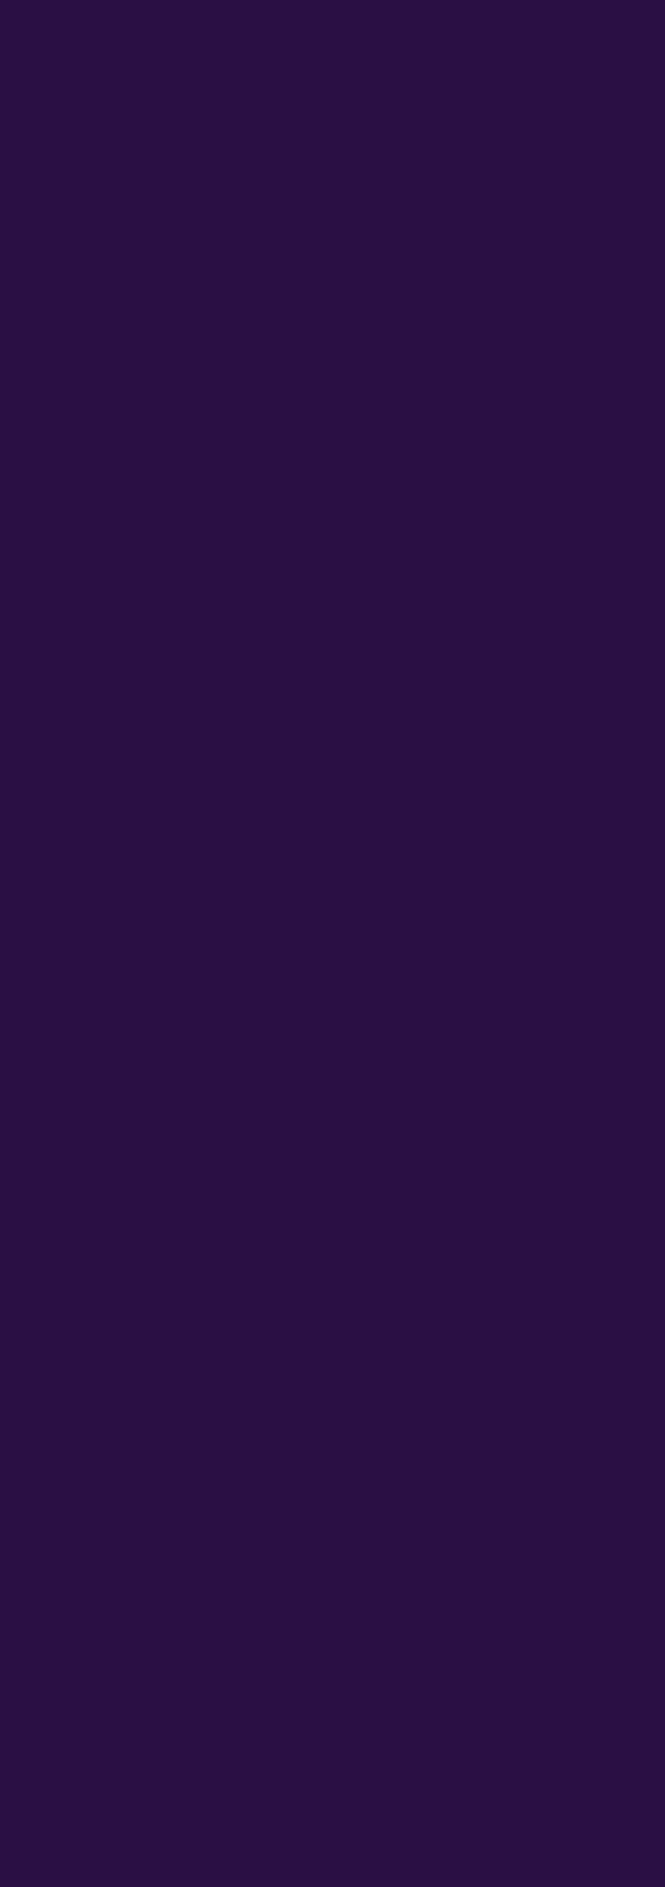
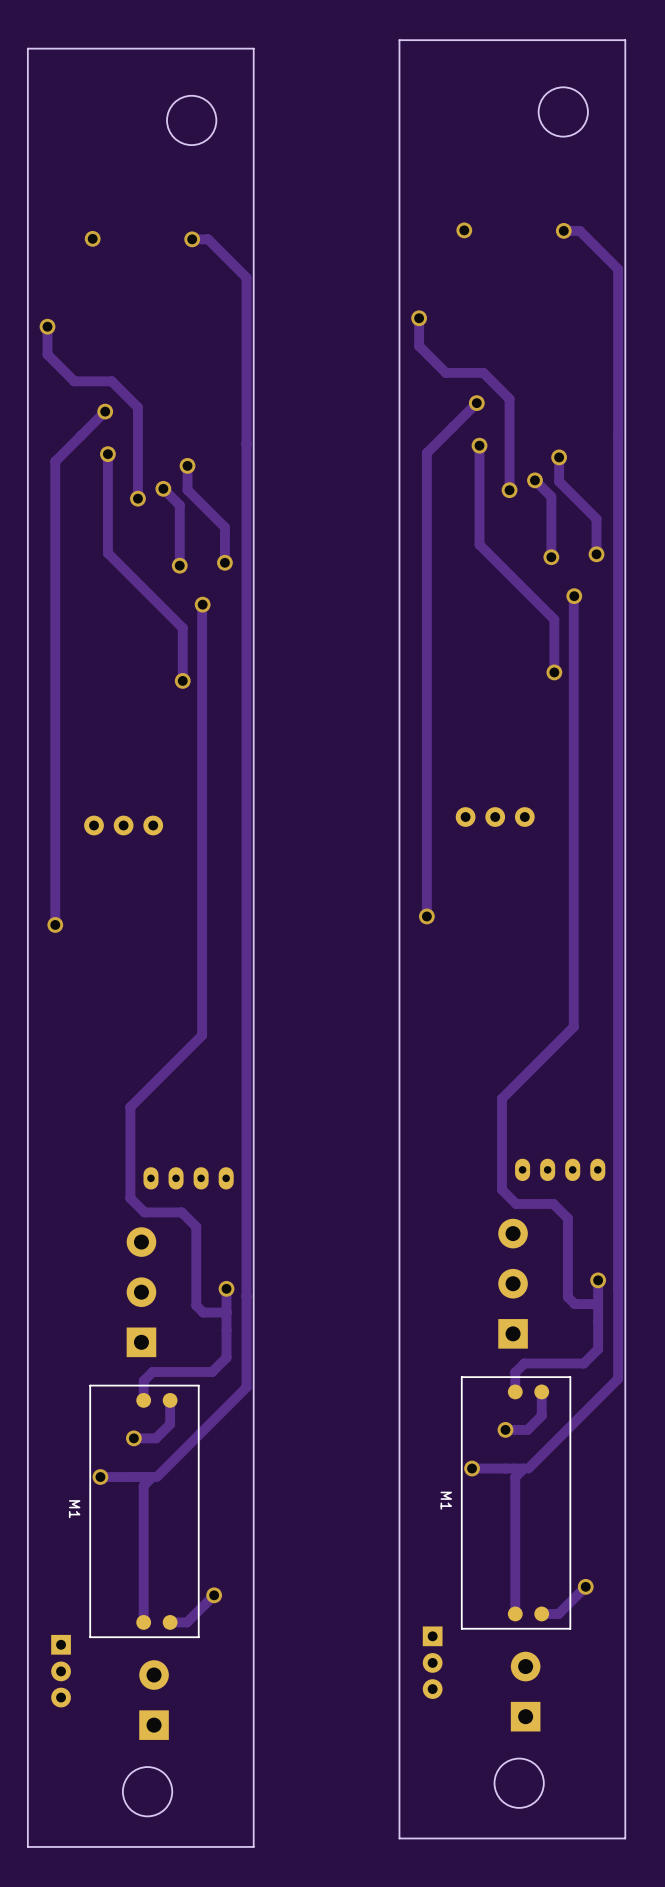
board edge: none -> (625, 40) (399, 40) (399, 1838) (625, 1838) (625, 40)
board edge: none -> (253, 48) (253, 1846) (27, 1846) (27, 48) (253, 48)
round board edge: none -> [538, 87, 589, 137]
round board edge: none -> [166, 95, 217, 146]
via: none -> (464, 230)
track: none -> (563, 230) (579, 230) (618, 269) (618, 435)
via: none -> (563, 230)
via: none -> (92, 238)
track: none -> (192, 239) (208, 239) (246, 277) (246, 1387) (156, 1477)
via: none -> (192, 239)
track: none -> (419, 318) (419, 346) (445, 372) (483, 372) (509, 399) (509, 490)
via: none -> (419, 318)
track: none -> (47, 326) (47, 354) (74, 381) (111, 381) (137, 407) (137, 498)
via: none -> (47, 326)
track: none -> (476, 403) (426, 453) (426, 916)
via: none -> (476, 403)
track: none -> (105, 411) (55, 461) (55, 924)
via: none -> (105, 411)
track: none -> (618, 435) (618, 1287)
track: none -> (479, 445) (479, 544) (554, 619) (554, 672)
via: none -> (479, 445)
track: none -> (107, 454) (107, 553) (182, 628) (182, 680)
via: none -> (107, 454)
track: none -> (559, 457) (559, 481) (596, 518) (596, 554)
via: none -> (559, 457)
track: none -> (187, 465) (187, 490) (224, 527) (224, 562)
via: none -> (187, 465)
track: none -> (534, 480) (551, 496) (551, 557)
via: none -> (534, 480)
track: none -> (163, 488) (179, 505) (179, 565)
via: none -> (163, 488)
via: none -> (509, 490)
via: none -> (137, 498)
via: none -> (596, 554)
via: none -> (551, 557)
via: none -> (224, 562)
via: none -> (179, 565)
track: none -> (574, 596) (573, 1026) (501, 1098) (501, 1189) (516, 1203) (553, 1203) (567, 1218) (567, 1297) (574, 1304) (598, 1304)
via: none -> (574, 596)
track: none -> (202, 604) (202, 1035) (130, 1107) (130, 1198) (144, 1212) (181, 1212) (196, 1226) (196, 1305) (203, 1312) (226, 1312)
via: none -> (202, 604)
via: none -> (554, 672)
via: none -> (182, 680)
part: none -> (495, 817)
part: none -> (123, 825)
via: none -> (426, 916)
via: none -> (55, 924)
part: none -> (560, 1169)
part: none -> (188, 1178)
track: none -> (598, 1280) (598, 1349) (583, 1363) (524, 1363) (515, 1372) (515, 1391)
via: none -> (598, 1280)
part: none -> (513, 1283)
track: none -> (618, 1287) (618, 1378) (528, 1468)
track: none -> (226, 1288) (226, 1357) (212, 1371) (152, 1371) (143, 1381) (143, 1400)
via: none -> (226, 1288)
part: none -> (141, 1292)
track: none -> (541, 1391) (541, 1415) (527, 1429) (505, 1430)
track: none -> (170, 1400) (170, 1424) (156, 1438) (134, 1438)
via: none -> (505, 1429)
via: none -> (133, 1438)
track: none -> (472, 1468) (524, 1468) (515, 1477) (515, 1613)
via: none -> (472, 1468)
track: none -> (100, 1477) (152, 1477) (143, 1485) (143, 1622)
via: none -> (100, 1477)
M1: none -> (516, 1502)
M1: none -> (144, 1511)
track: none -> (585, 1586) (558, 1613) (541, 1613)
via: none -> (585, 1586)
track: none -> (214, 1595) (187, 1622) (170, 1622)
via: none -> (214, 1595)
part: none -> (432, 1662)
part: none -> (61, 1671)
part: none -> (525, 1691)
part: none -> (154, 1700)
round board edge: none -> [494, 1758, 545, 1809]
round board edge: none -> [122, 1766, 173, 1817]

